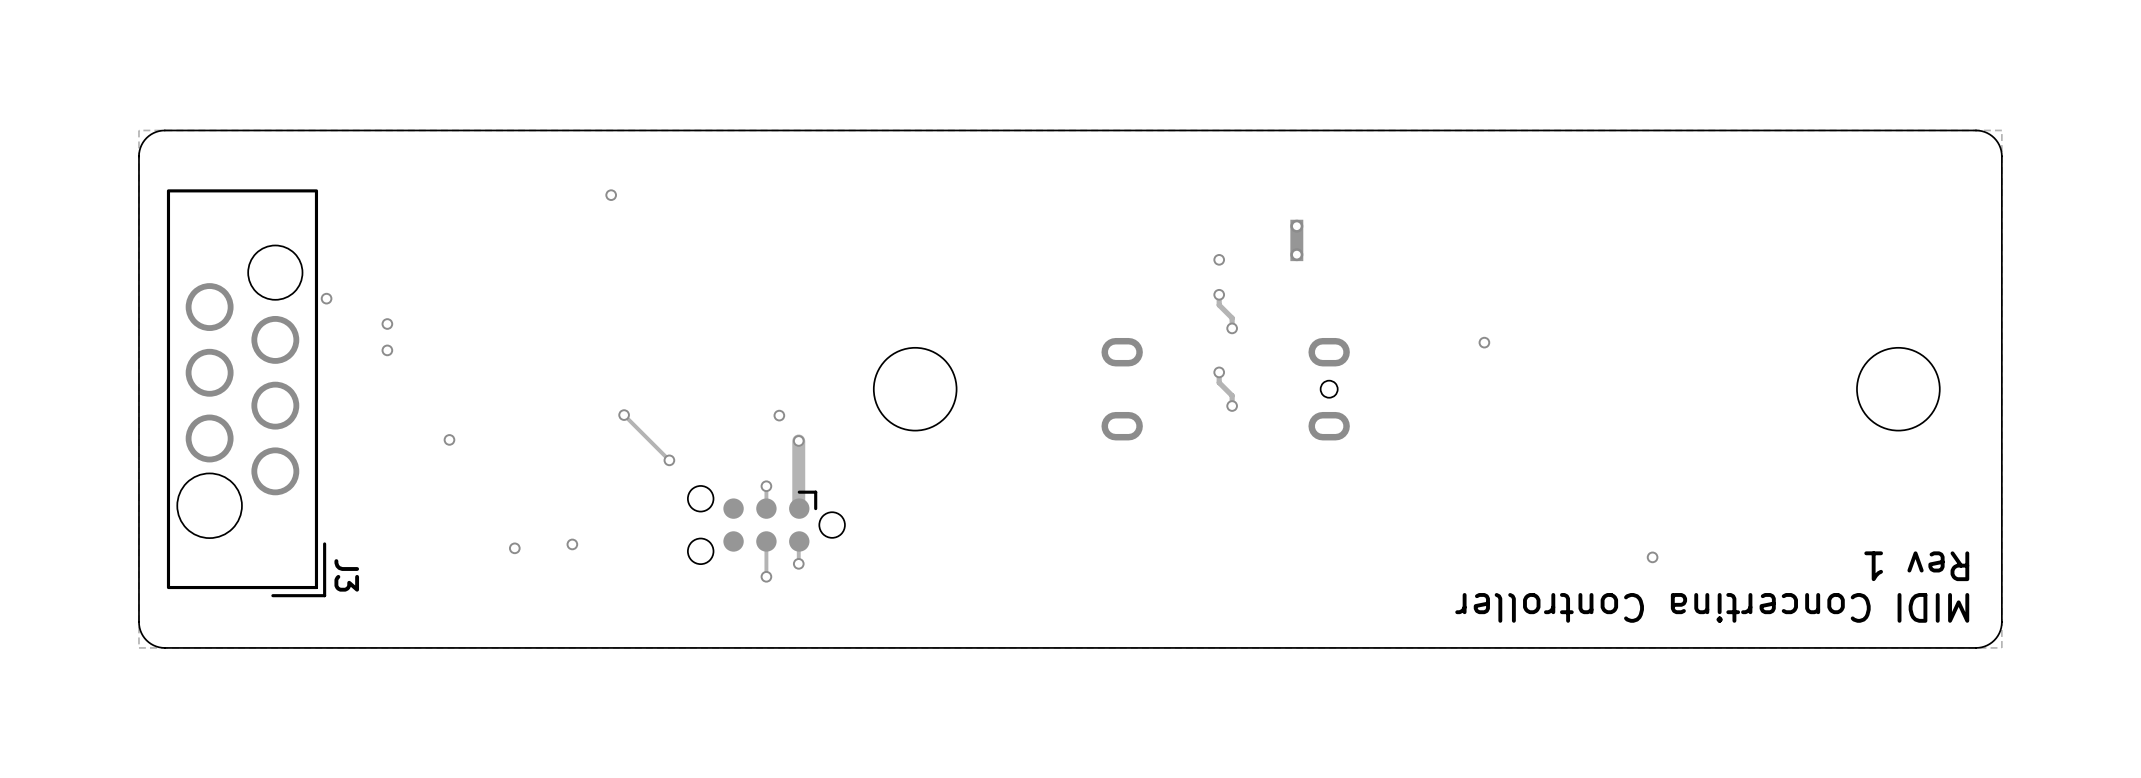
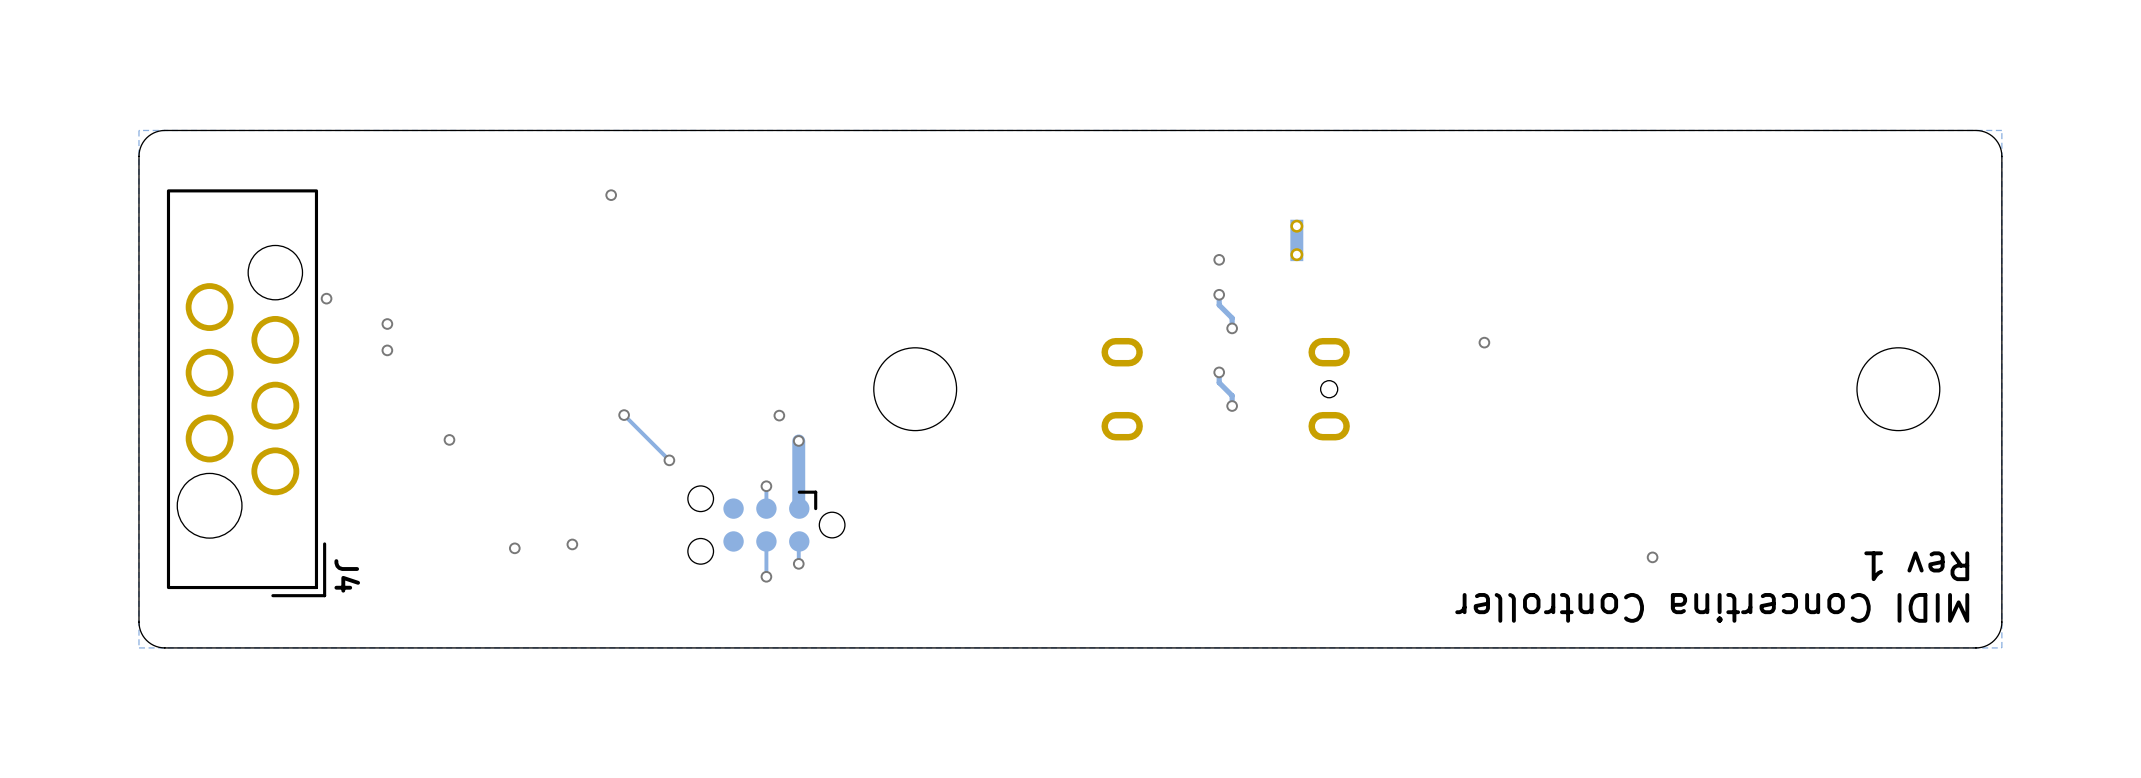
J3 name: J3 (346, 575) -> J4 (347, 575)

